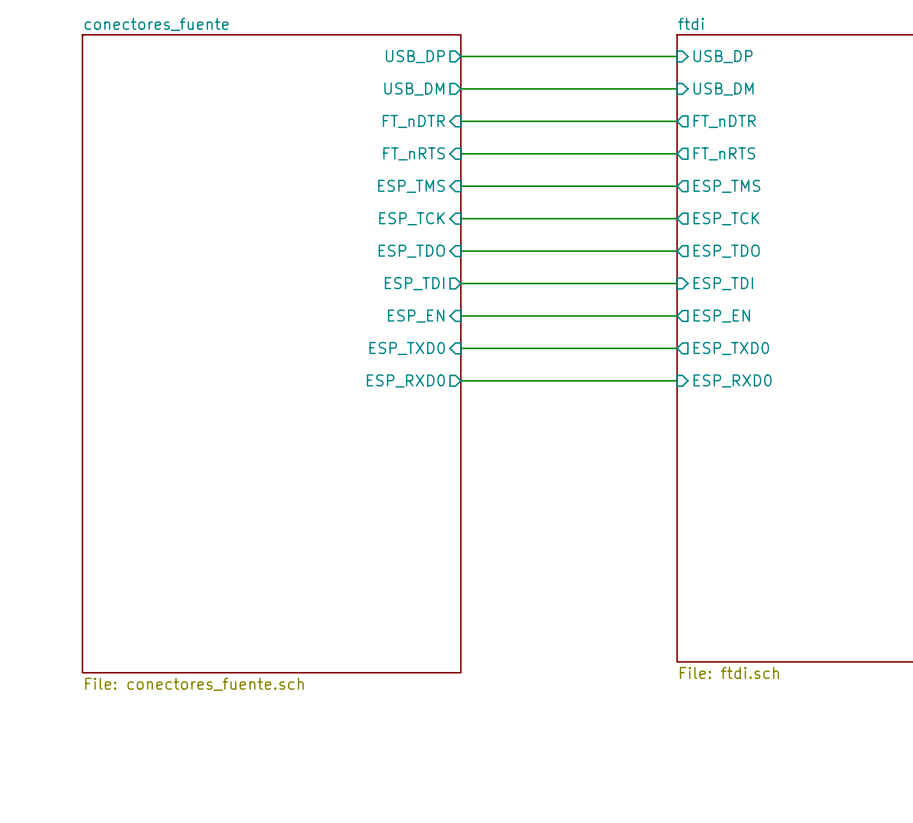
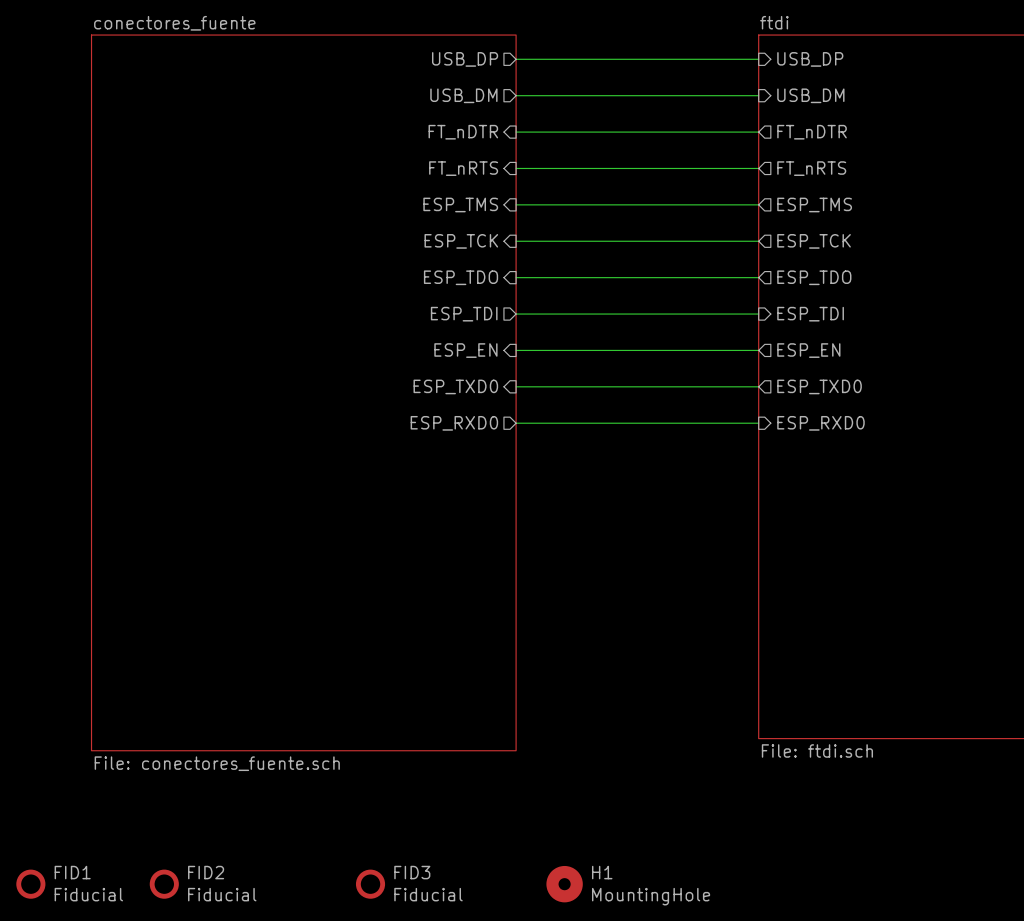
FID1: none -> Fiducial (30, 884)
FID2: none -> Fiducial (164, 884)
FID3: none -> Fiducial (370, 884)
H1: none -> MountingHole (564, 884)

